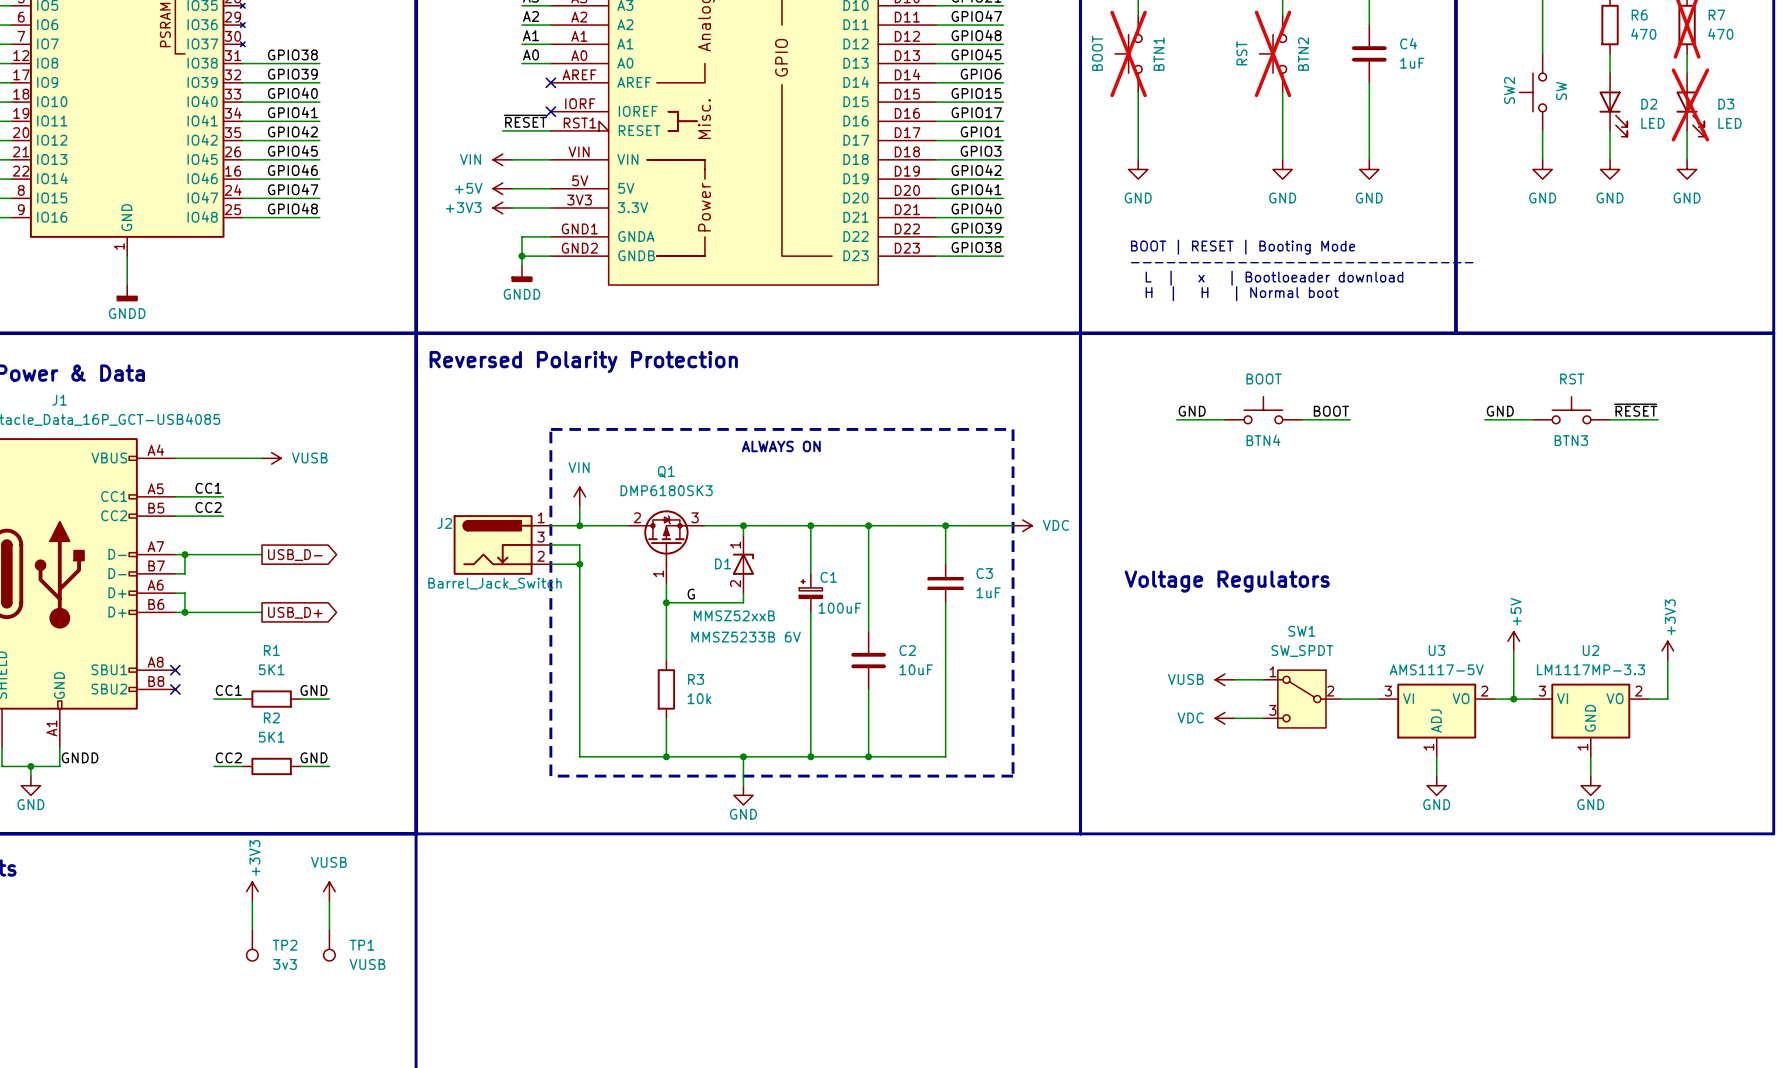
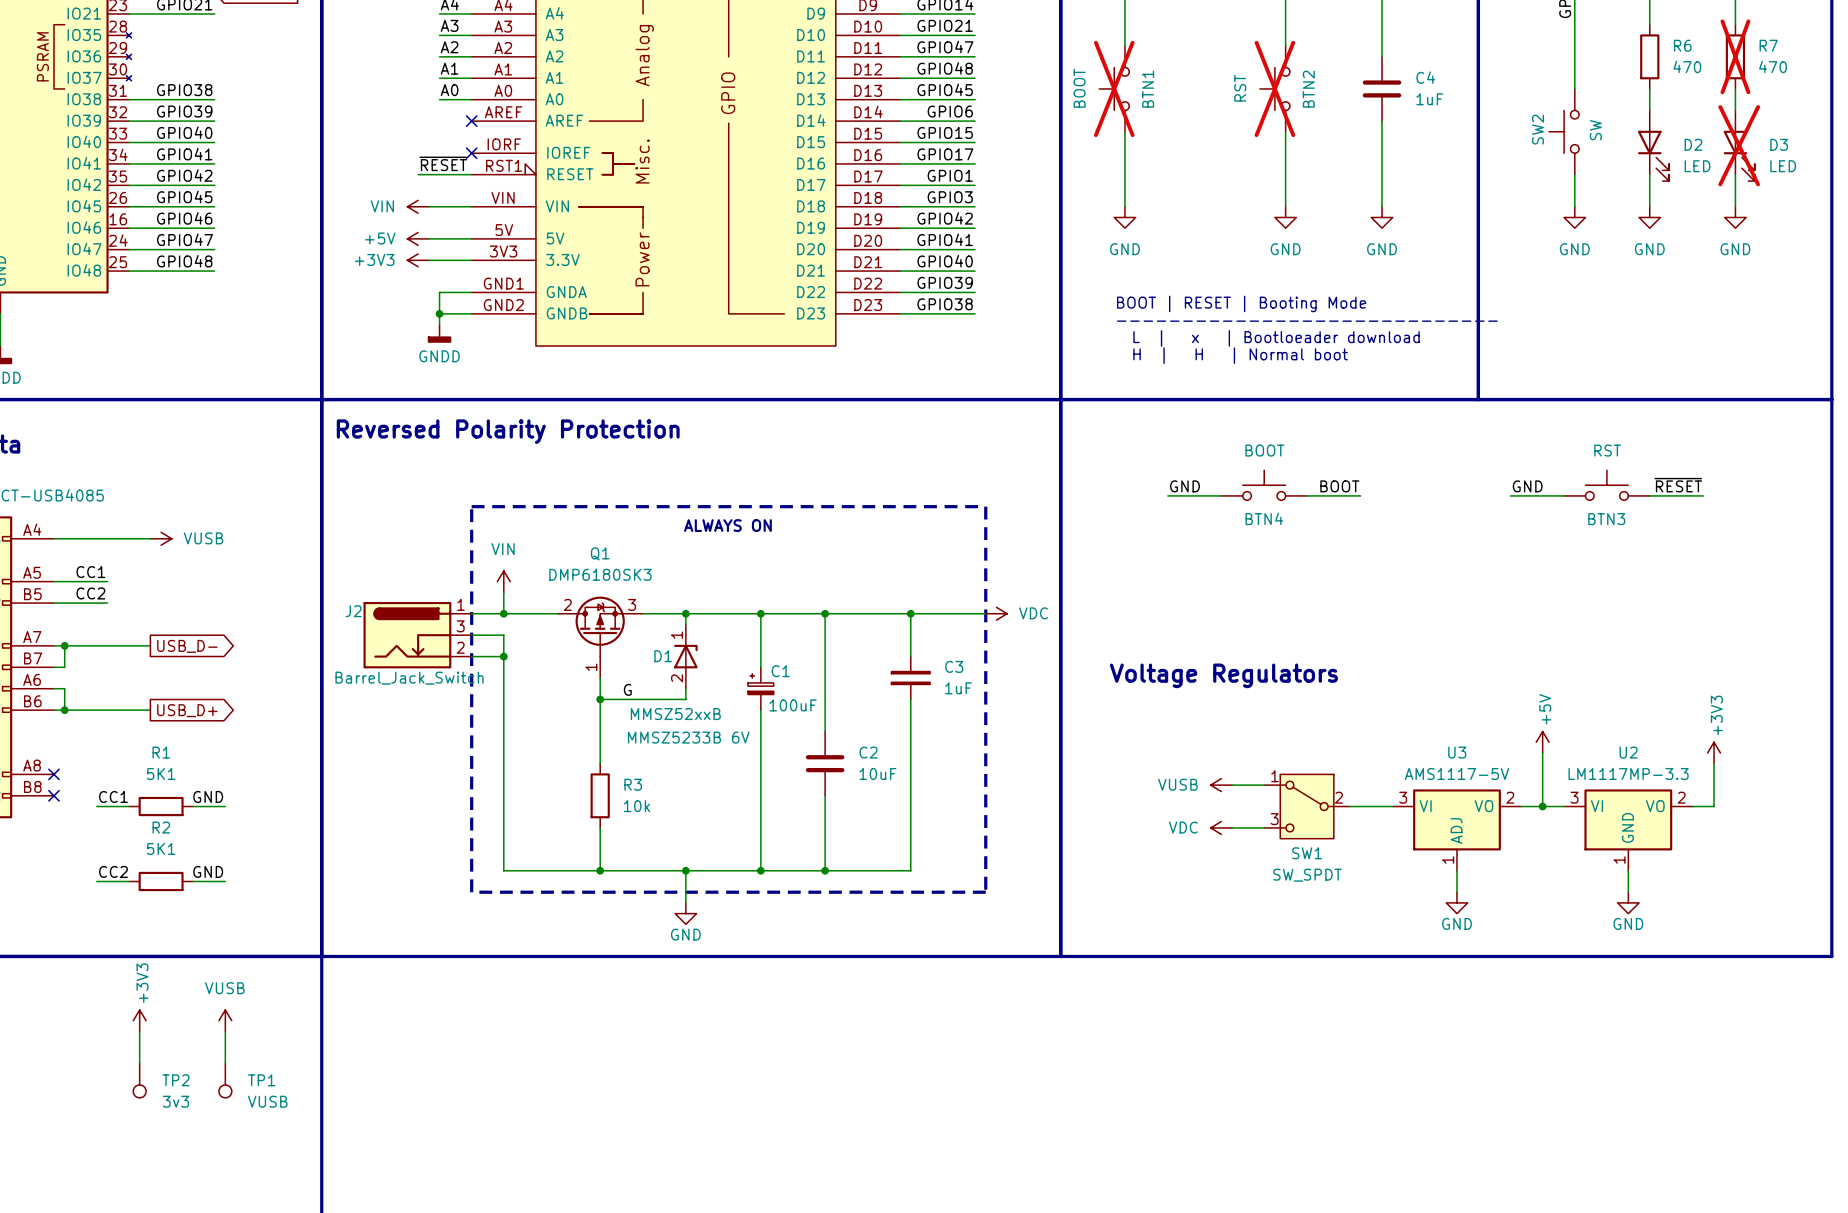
SW1 name position: SW1 (1301, 631) -> SW1 (1307, 853)
SW1 value position: SW_SPDT (1302, 651) -> SW_SPDT (1307, 875)

